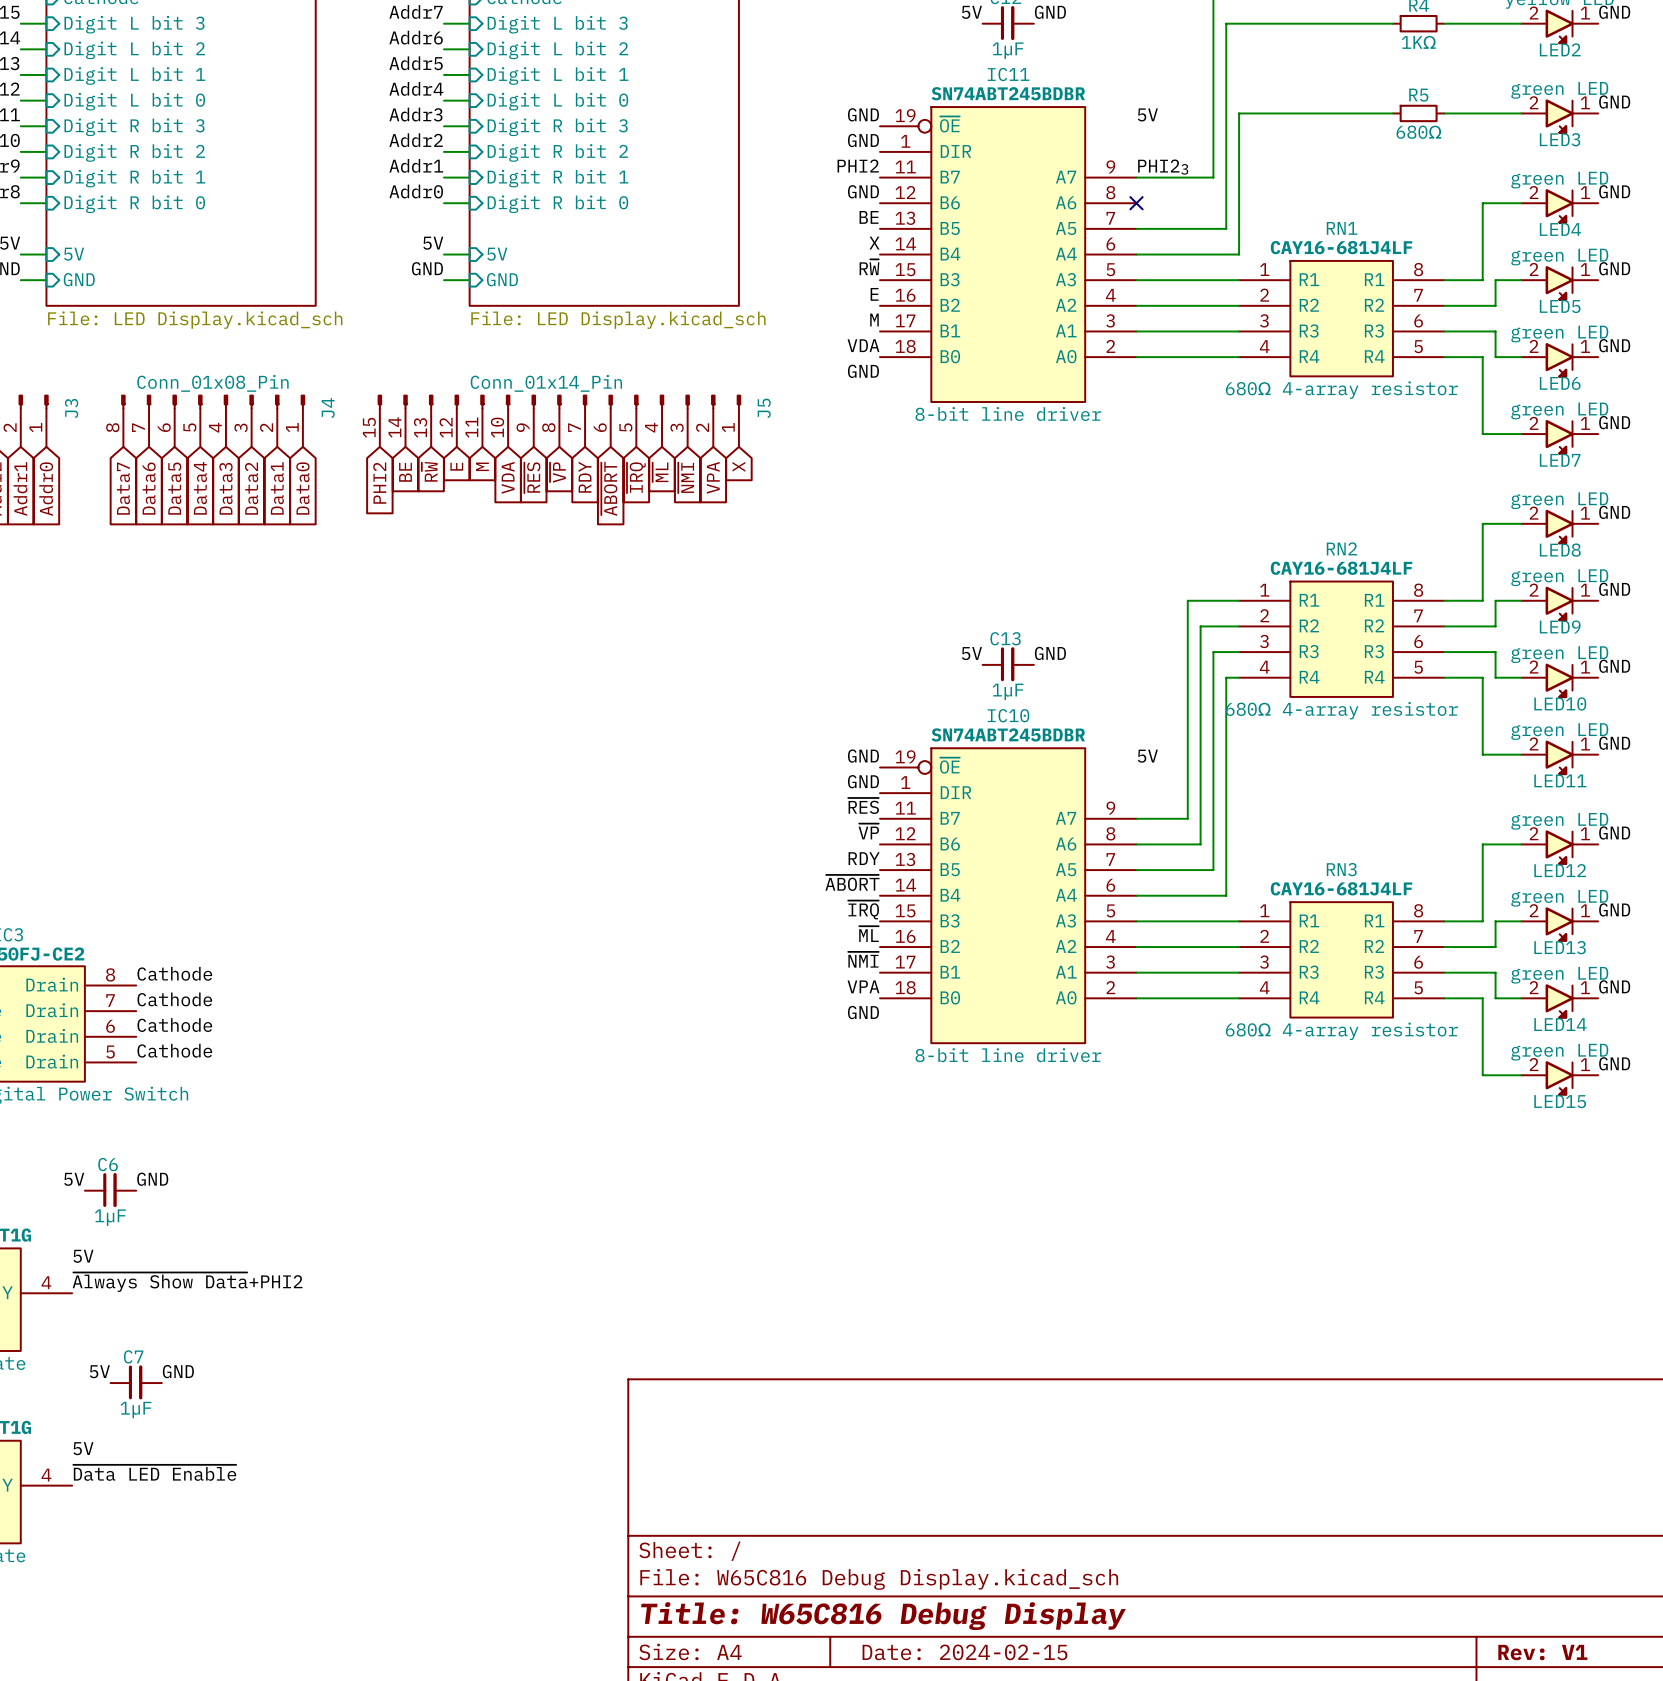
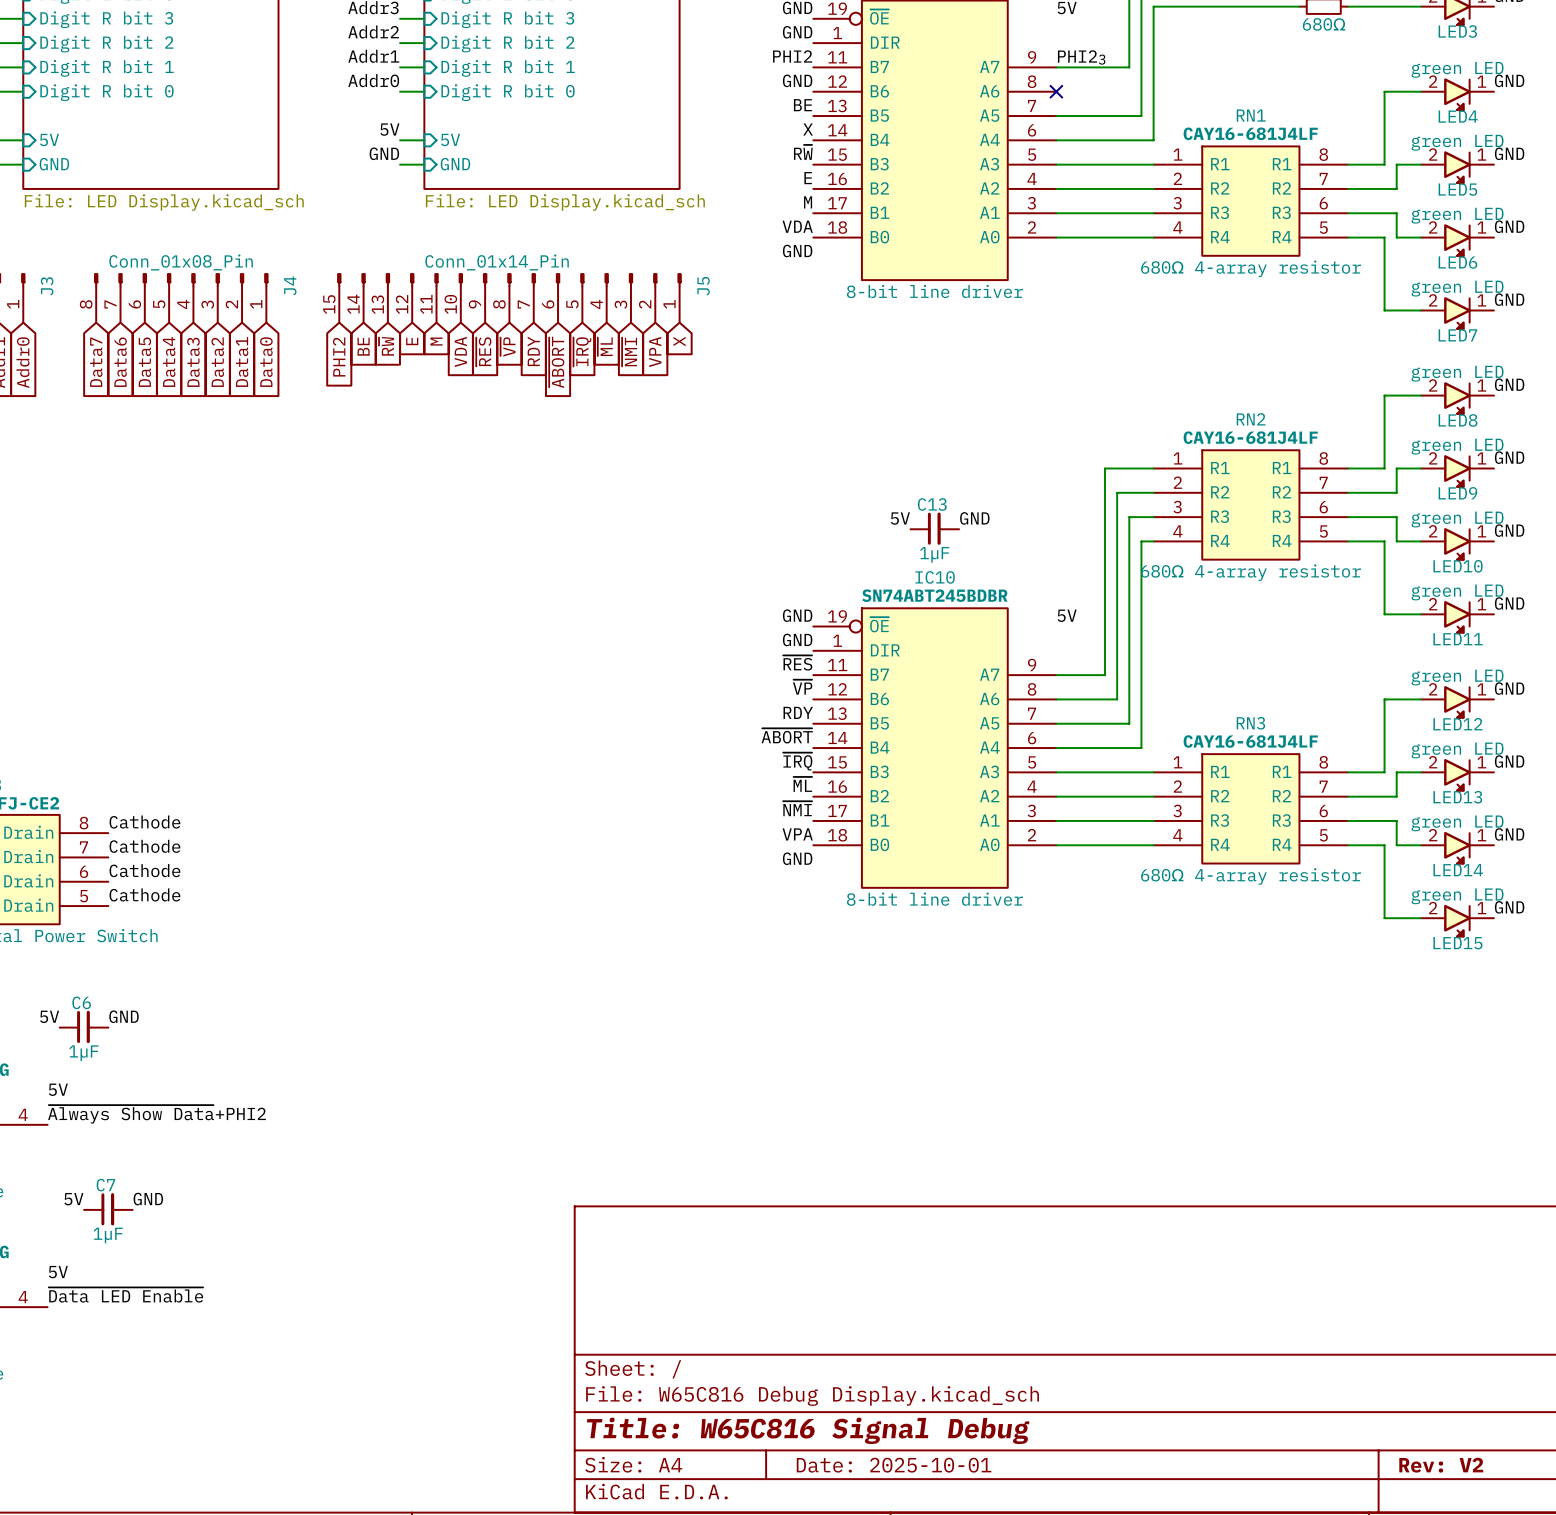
title block: Title: W65C816 Debug Display (883, 1616) -> Title: W65C816 Signal Debug (808, 1430)
title block: Date: 2024-02-15 (964, 1652) -> Date: 2025-10-01 (894, 1465)
title block: Rev: V1 (1542, 1652) -> Rev: V2 (1441, 1465)

